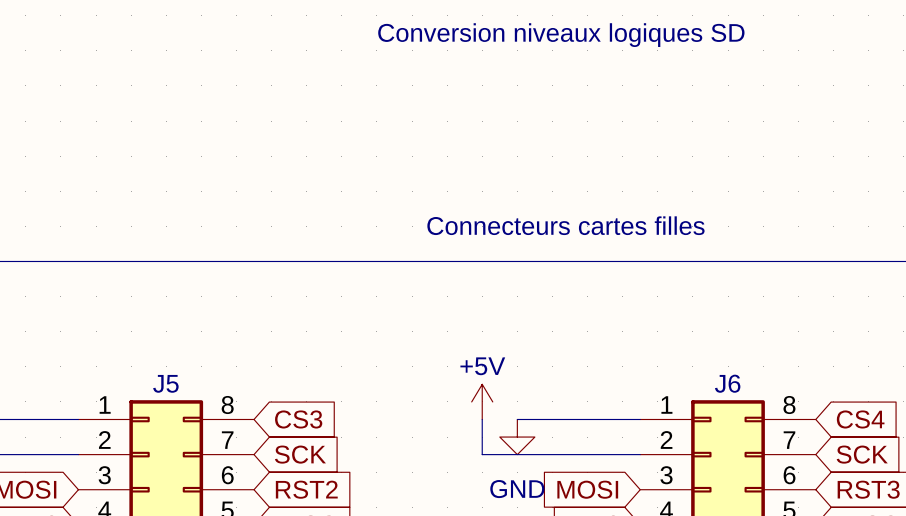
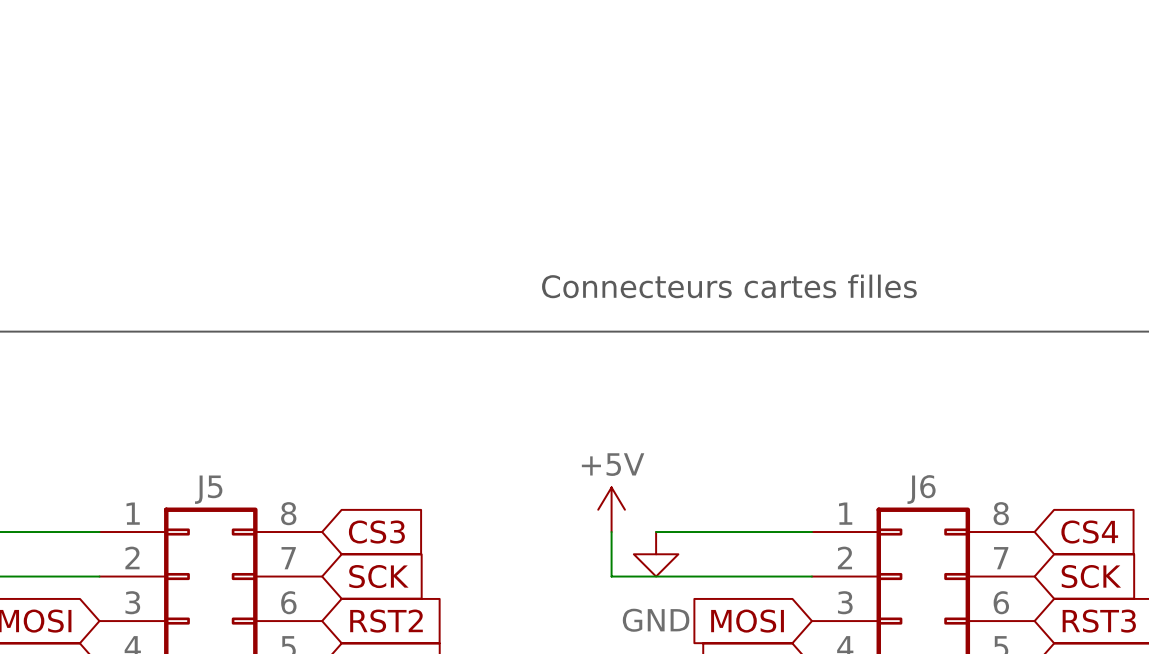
text: Conversion niveaux logiques SD (561, 35) -> none

